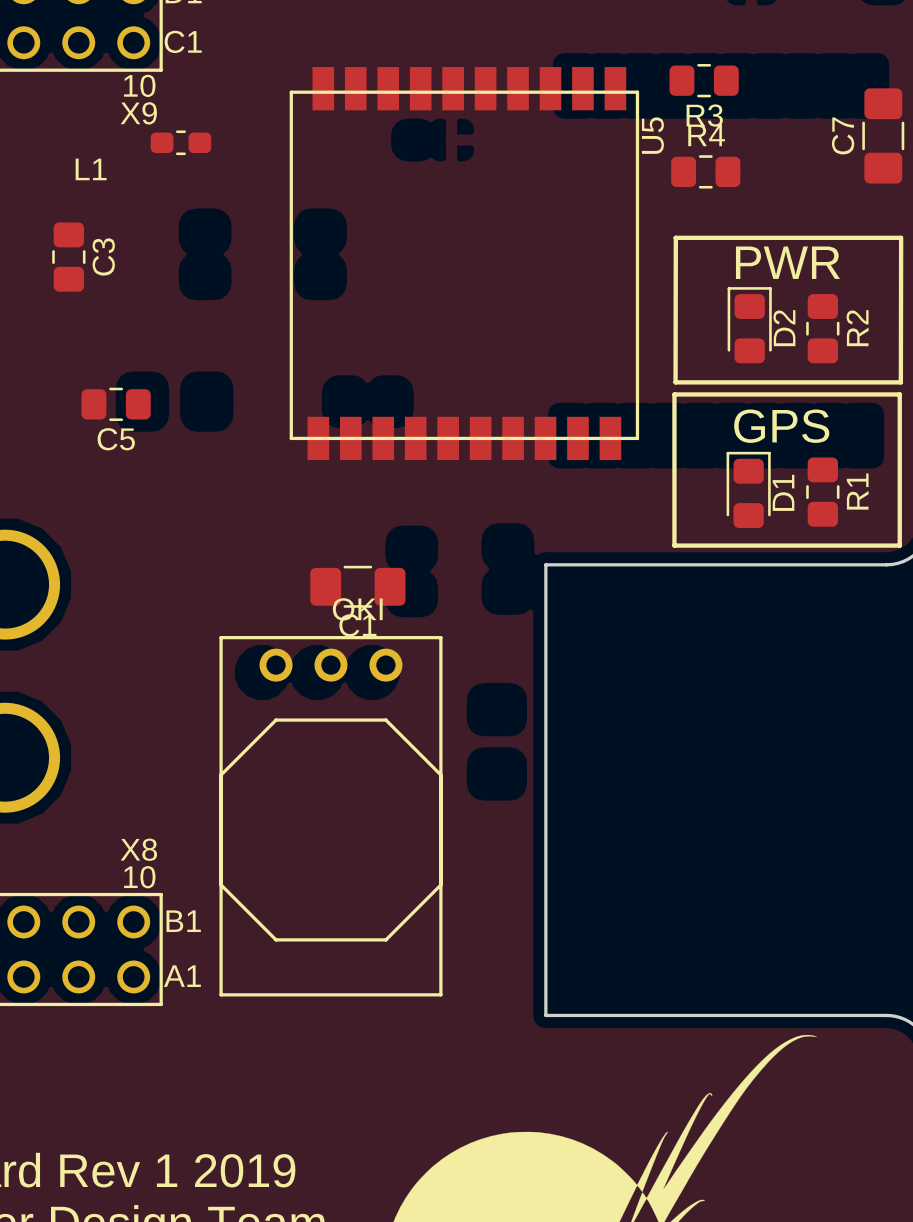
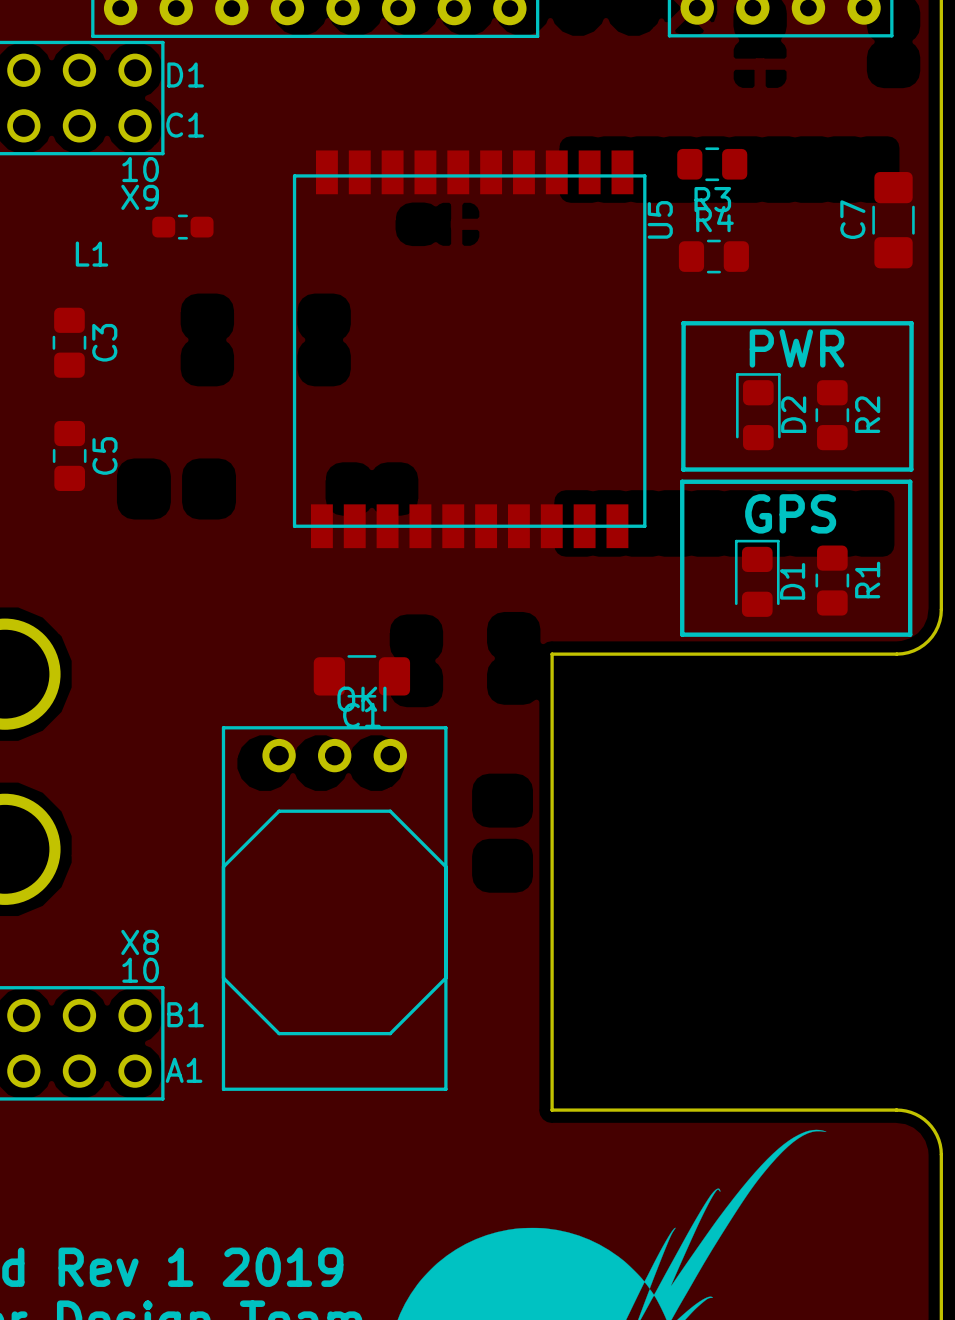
C5 rotation: 0° (116, 404) -> 90° clockwise (69, 455)
C5 position: (116, 404) -> (69, 455)
C5 name position: C5 (116, 439) -> C5 (104, 455)

